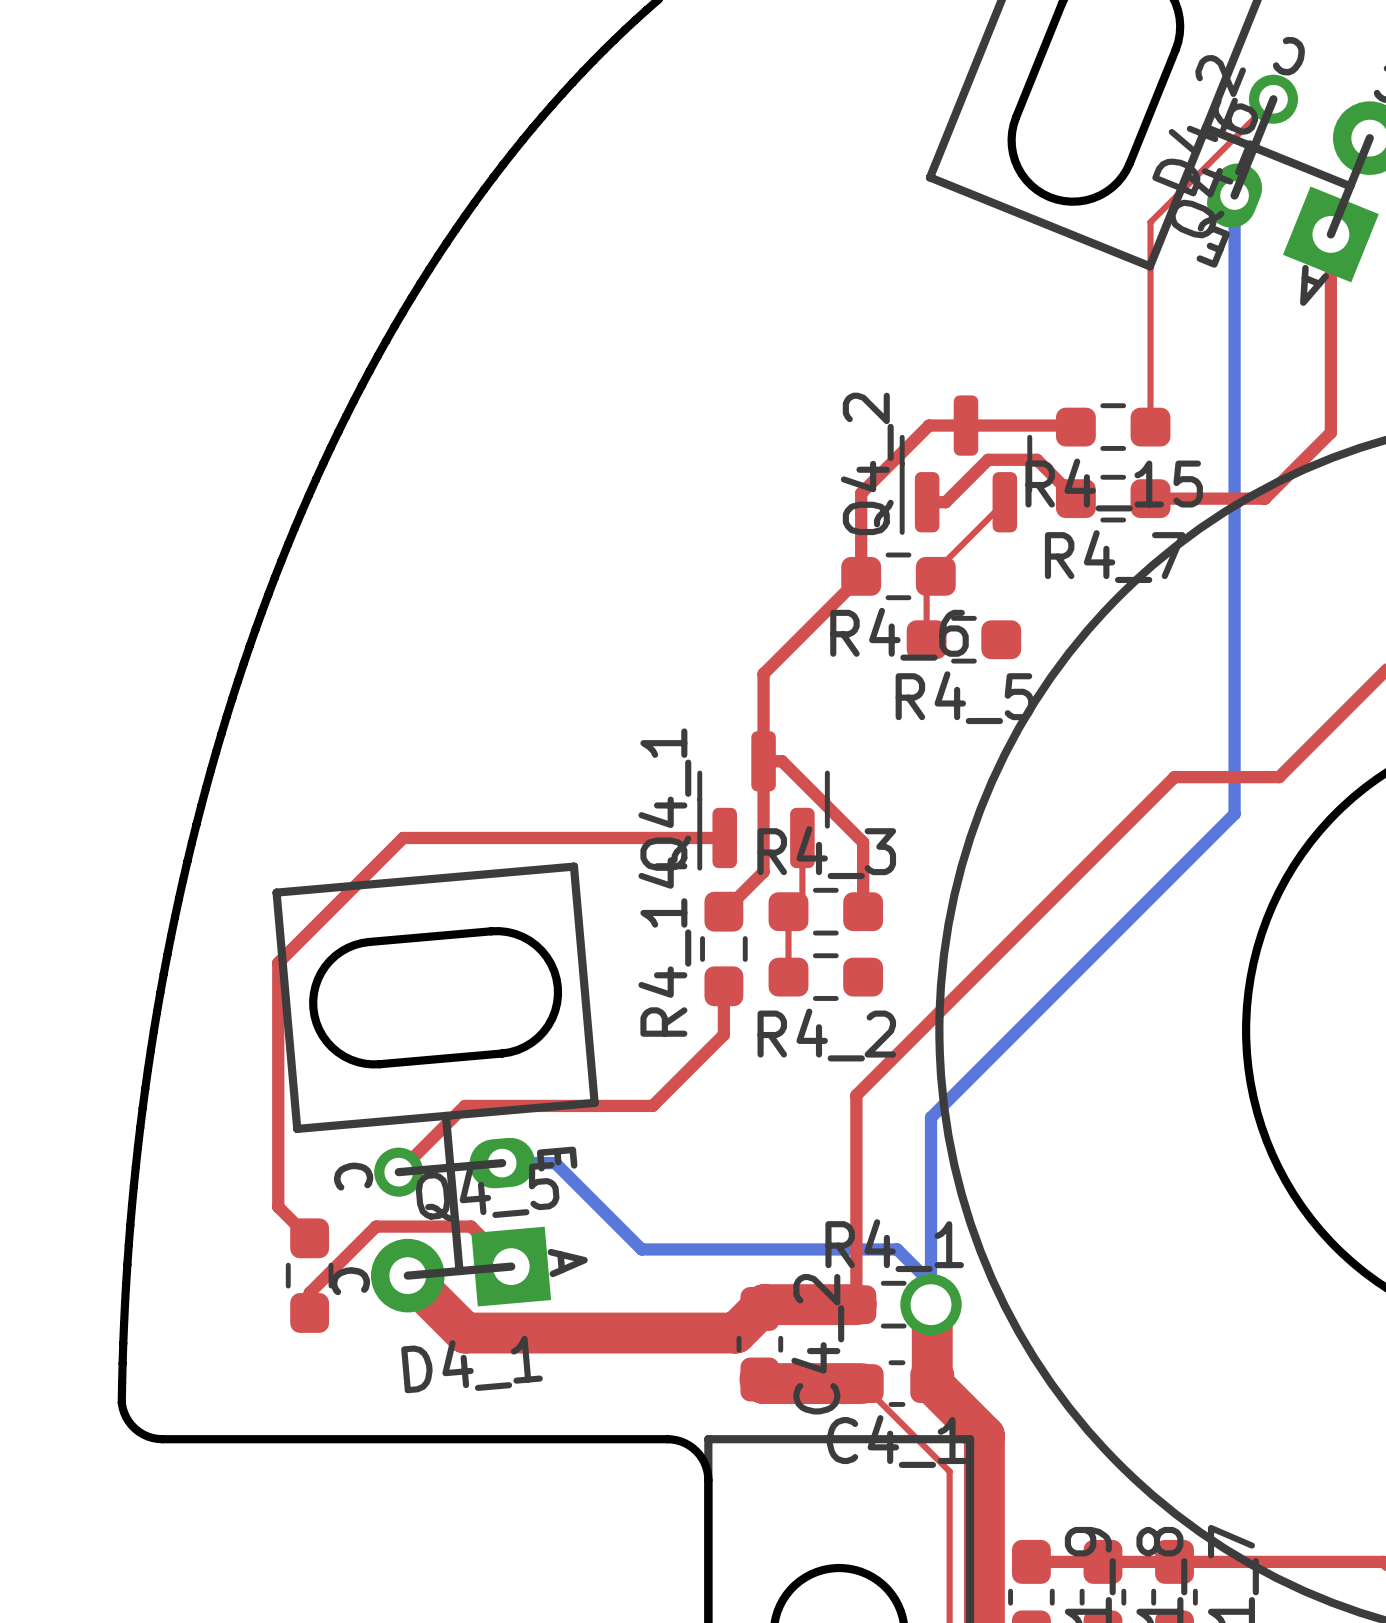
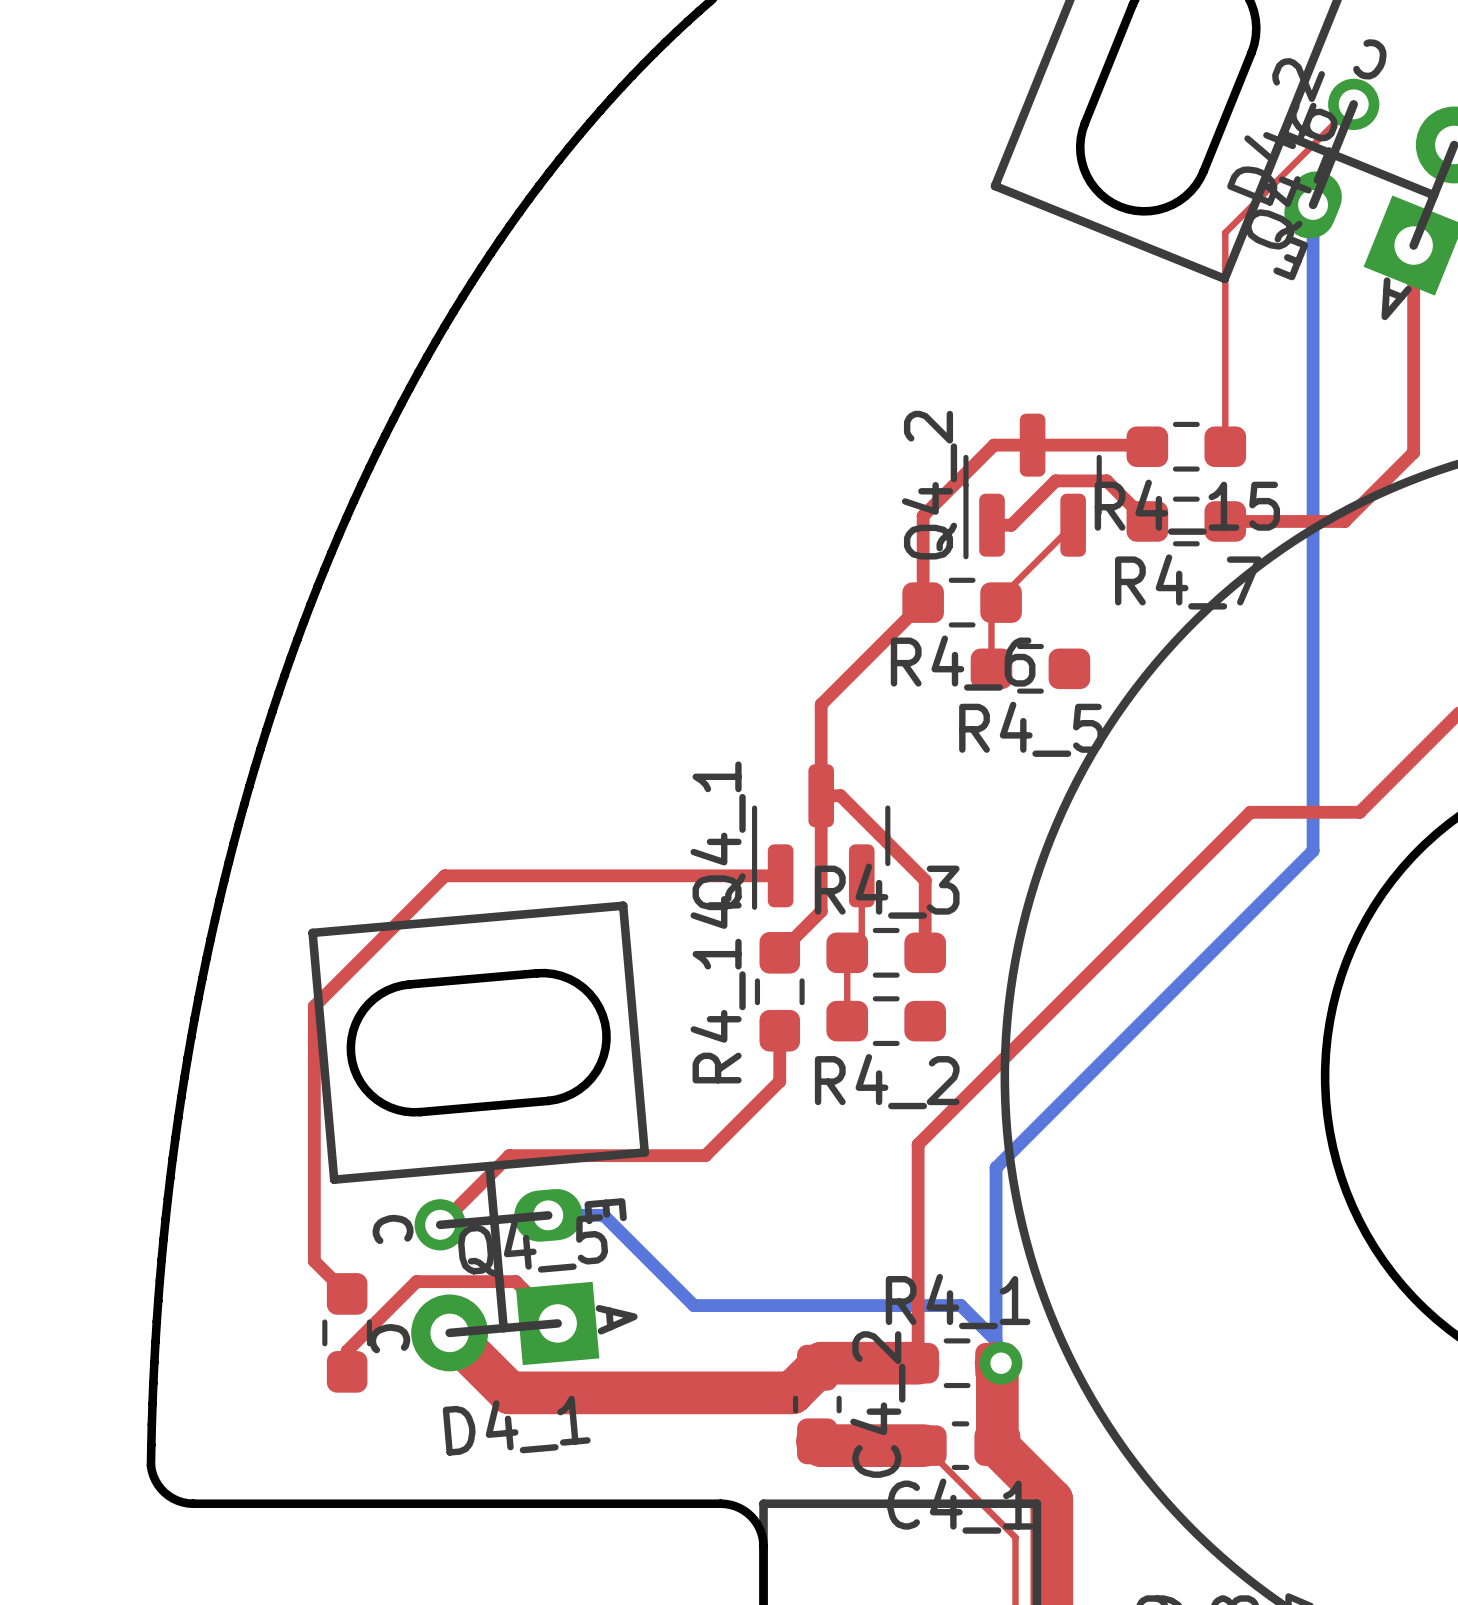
via size: [900, 1274, 962, 1336] -> [979, 1341, 1023, 1385]

